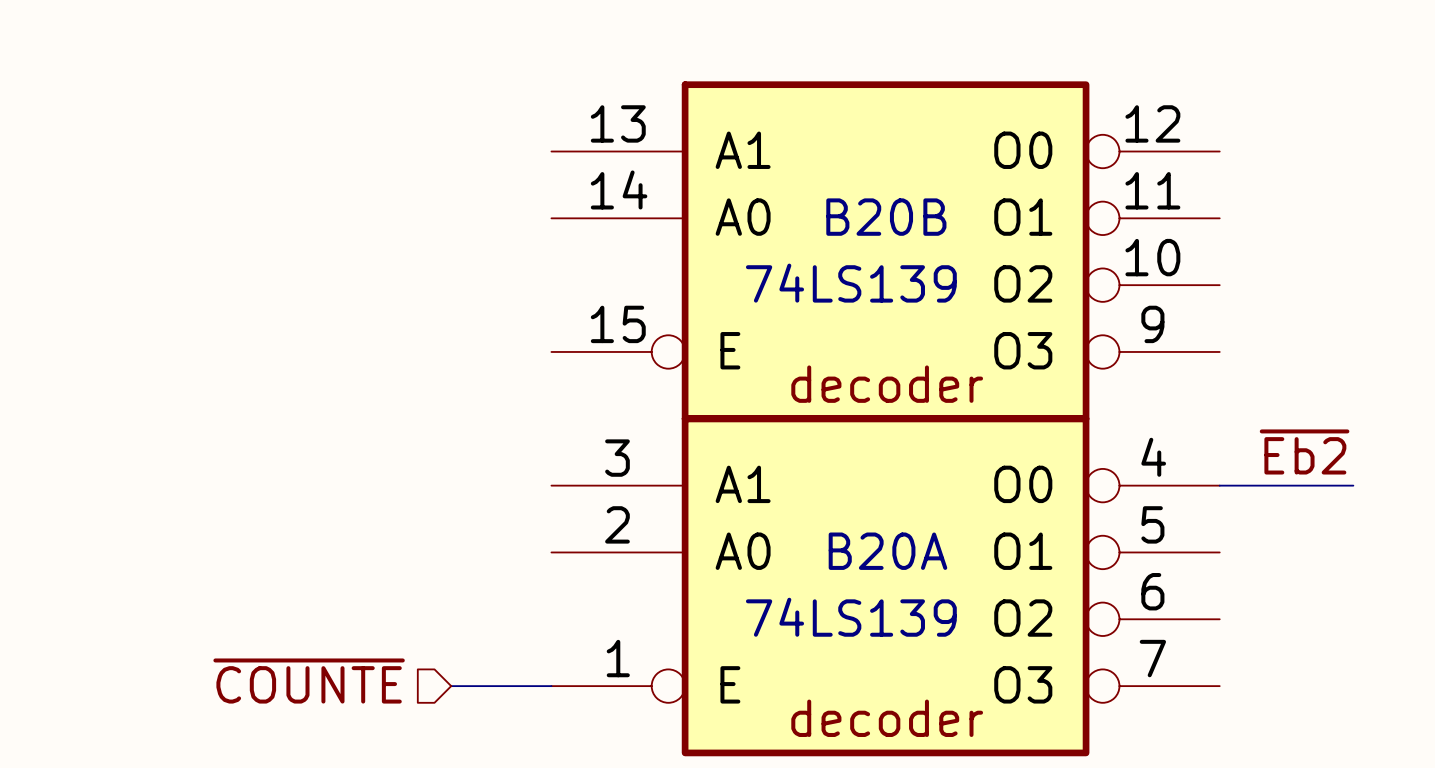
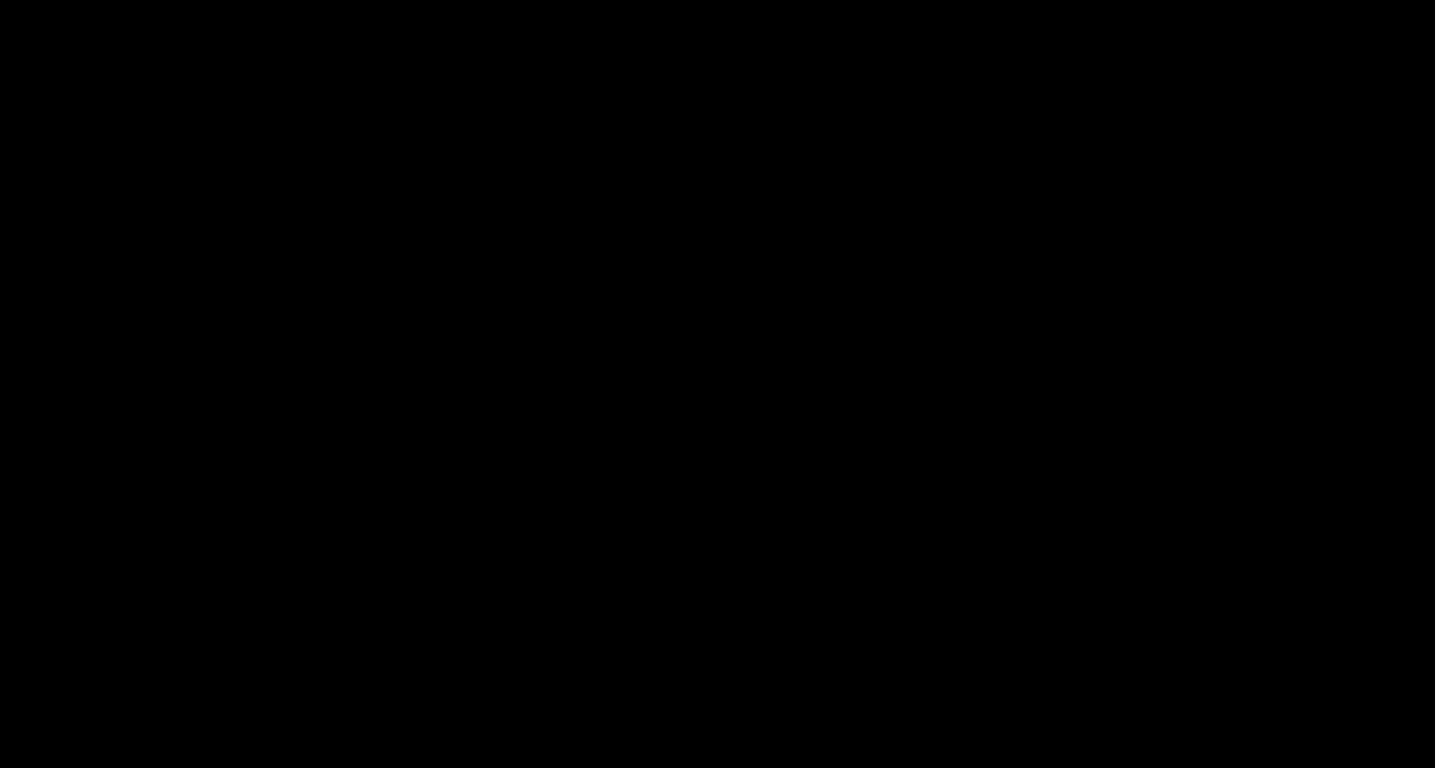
B20B: 74LS139 (885, 251) -> none
label: ~{Eb2} (1304, 451) -> none
wire: (1219, 485) (1353, 485) -> none
B20A: 74LS139 (885, 585) -> none
hierarchical label: ~{COUNTE} (309, 681) -> none
wire: (451, 686) (551, 686) -> none

